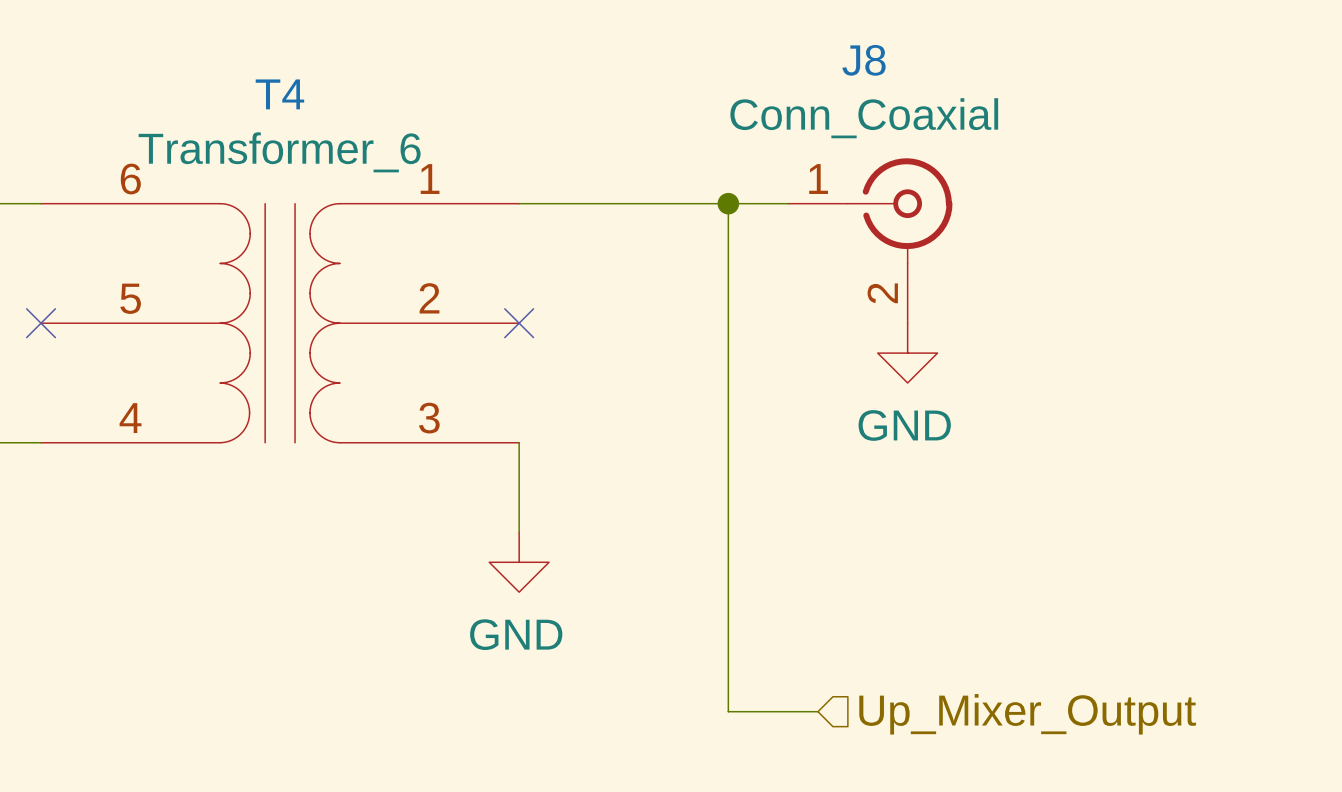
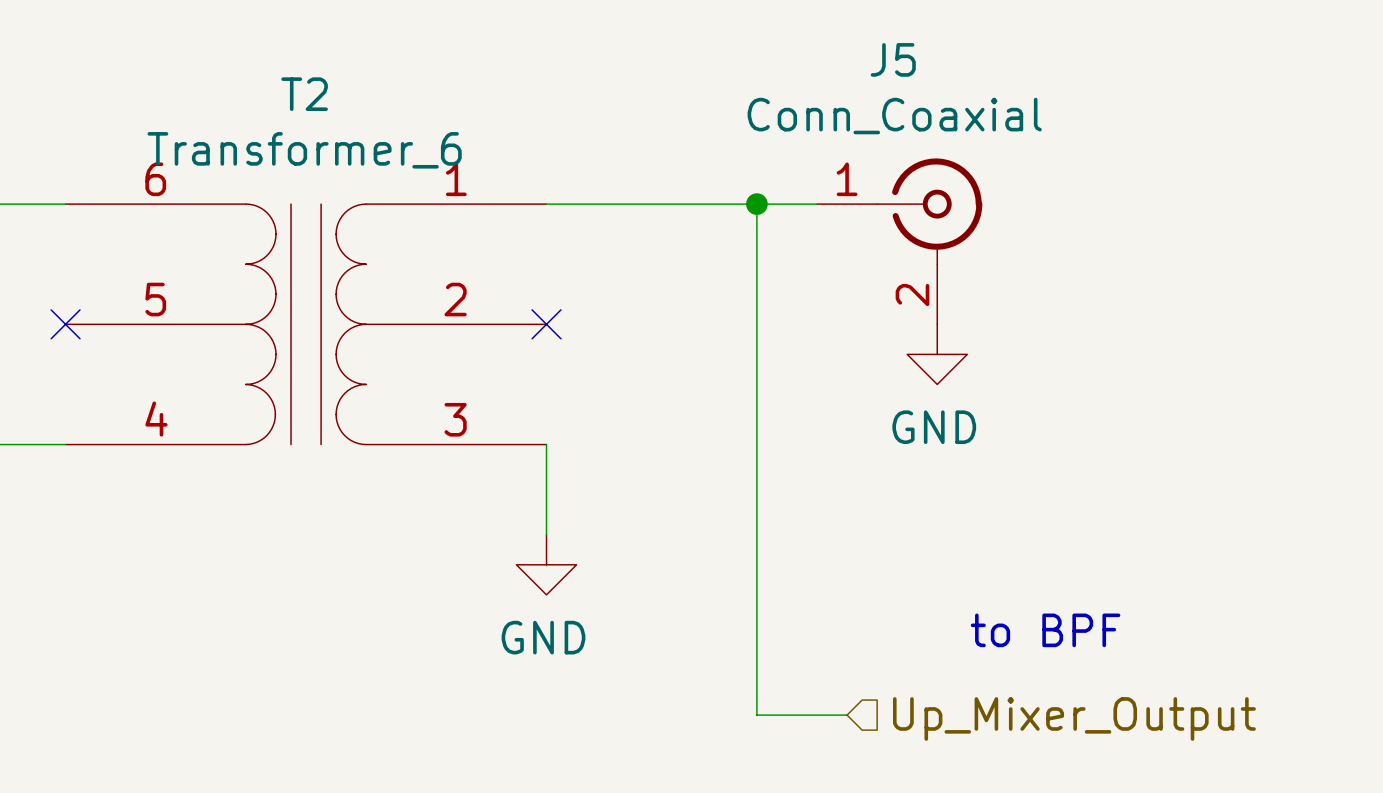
J8 name: J8 (864, 60) -> J5 (893, 59)
T4 name: T4 (279, 94) -> T2 (304, 94)
text: none -> to BPF (1045, 630)

